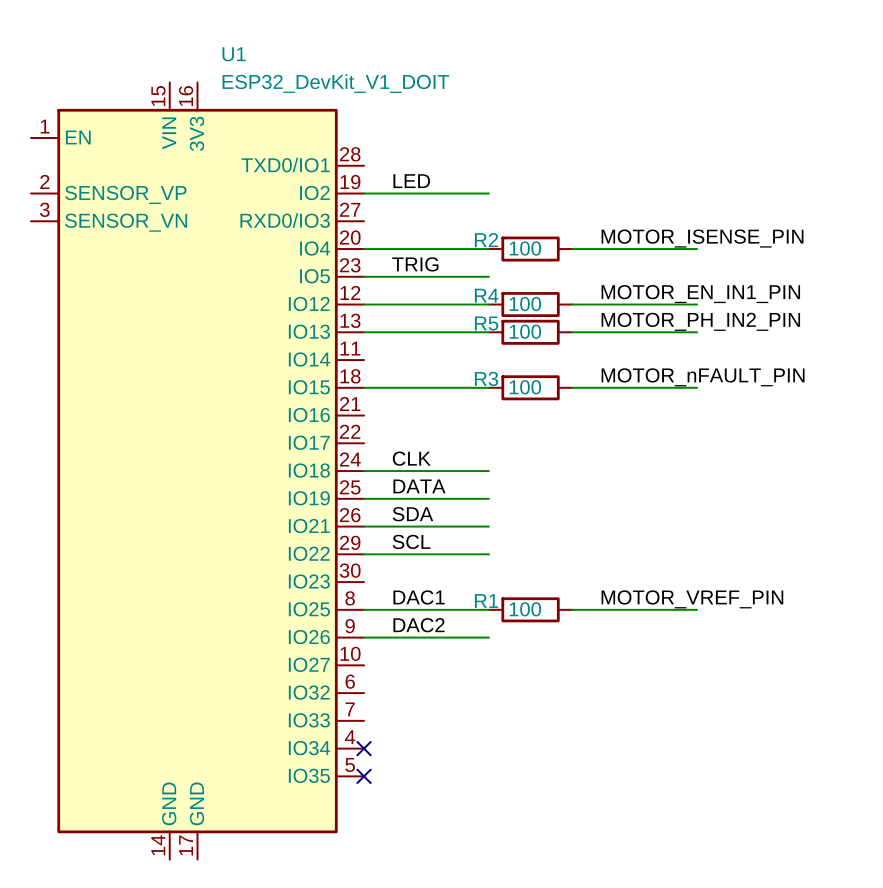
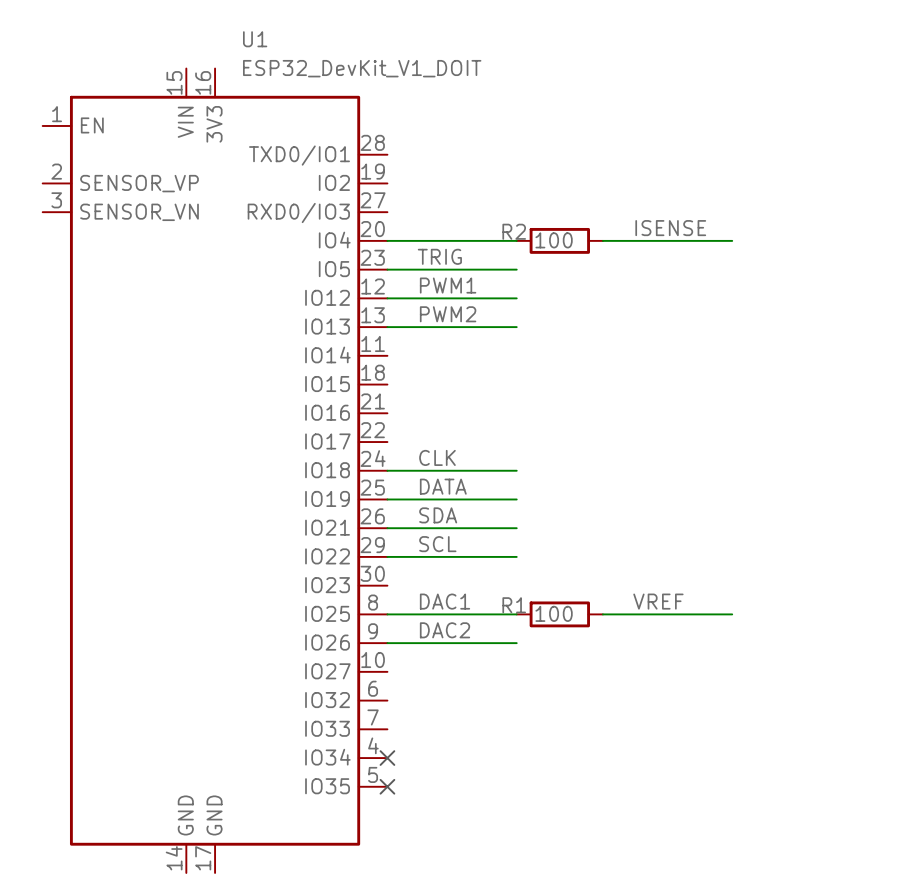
label: LED (411, 181) -> none
wire: (364, 193) (488, 193) -> none
label: MOTOR_ISENSE_PIN (702, 238) -> ISENSE (670, 228)
label: none -> PWM1 (448, 285)
label: MOTOR_EN_IN1_PIN (700, 294) -> none
R4: 100 (530, 304) -> none
wire: (572, 304) (697, 304) -> none
label: none -> PWM2 (448, 314)
label: MOTOR_PH_IN2_PIN (700, 321) -> none
R5: 100 (530, 332) -> none
wire: (572, 332) (697, 332) -> none
label: MOTOR_nFAULT_PIN (703, 377) -> none
wire: (364, 387) (488, 387) -> none
R3: 100 (530, 387) -> none
wire: (572, 387) (697, 387) -> none
label: MOTOR_VREF_PIN (692, 599) -> VREF (658, 601)

